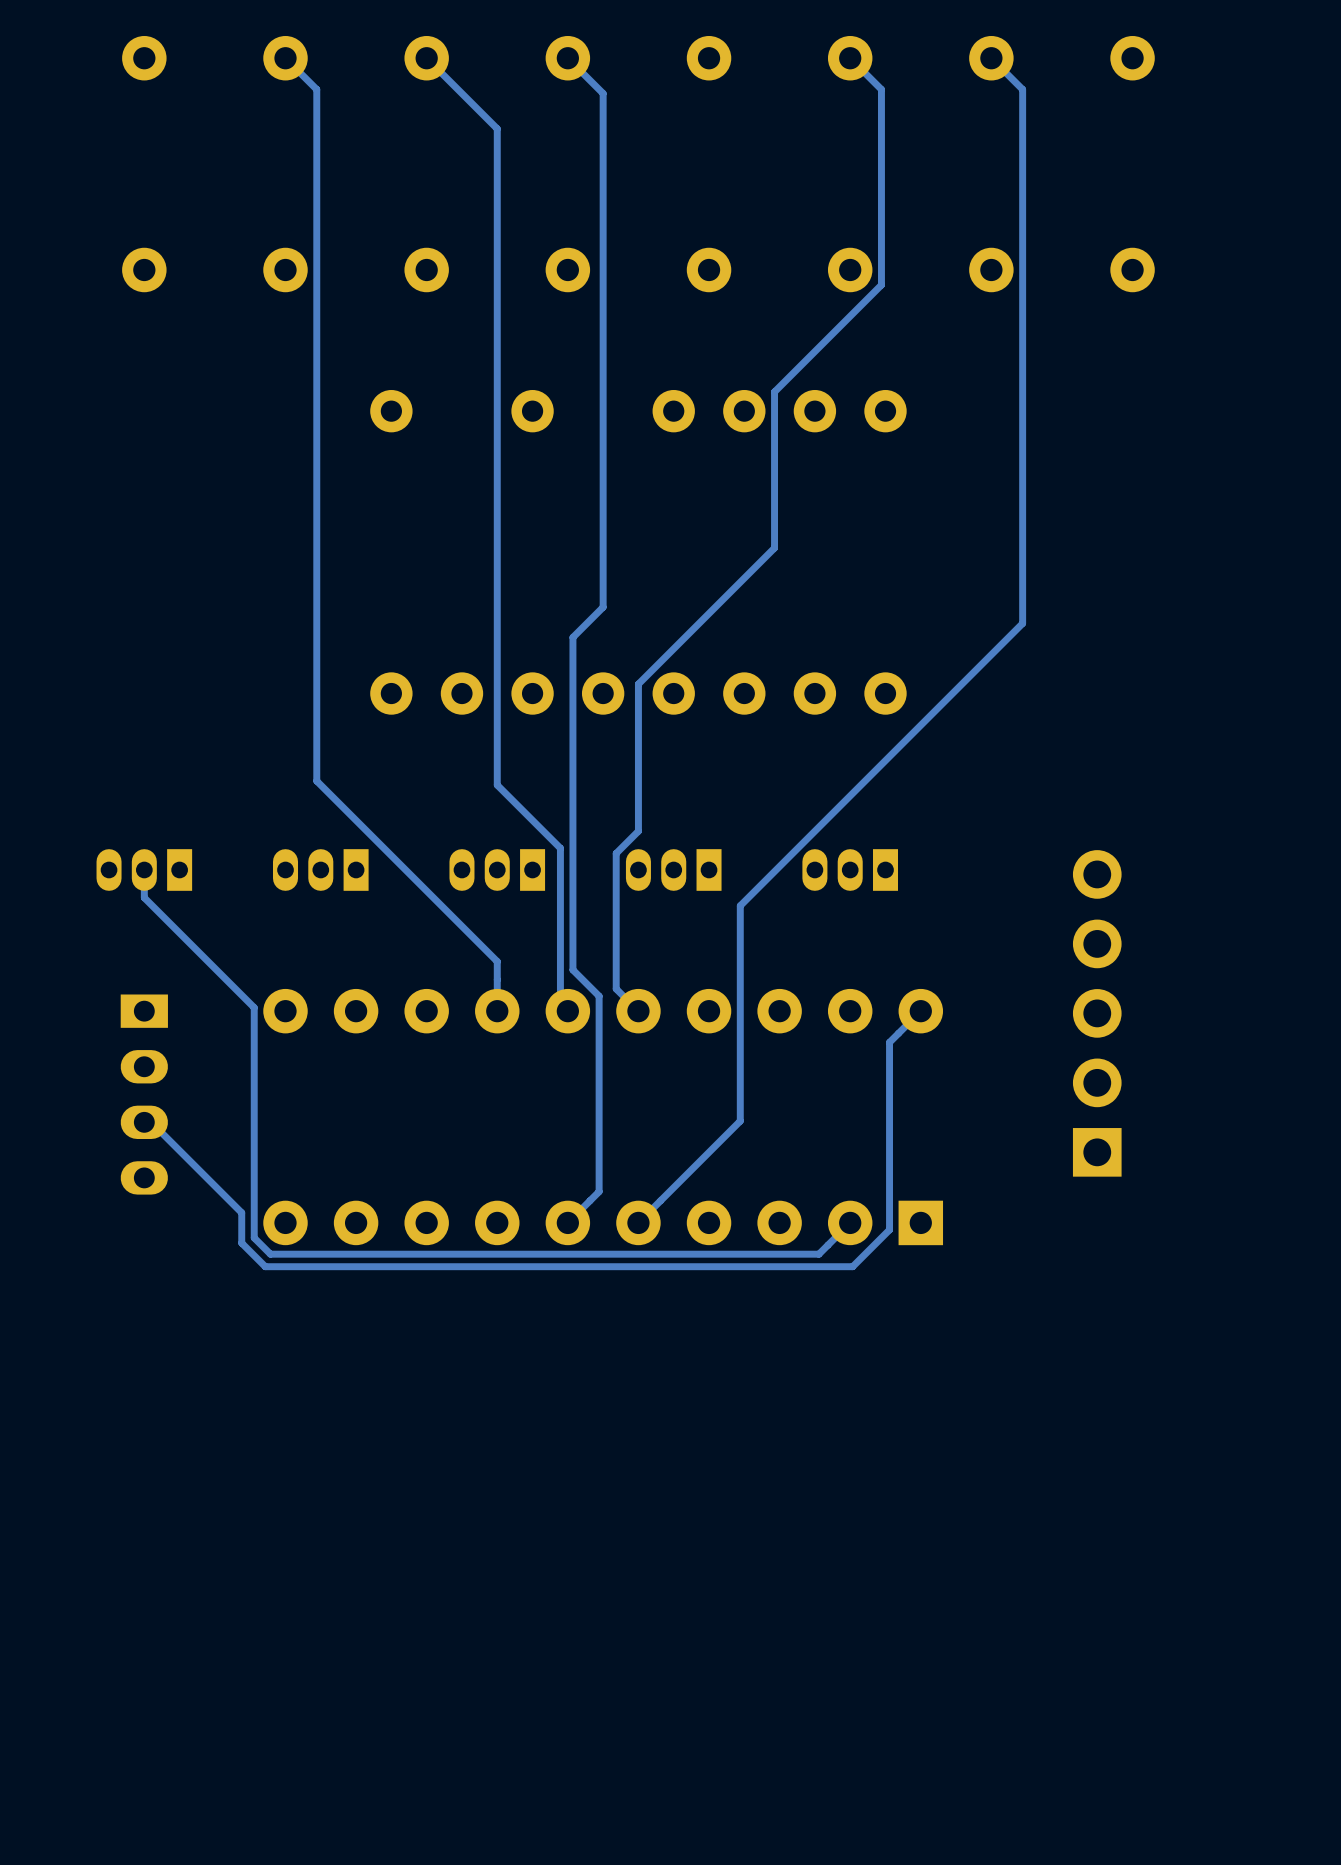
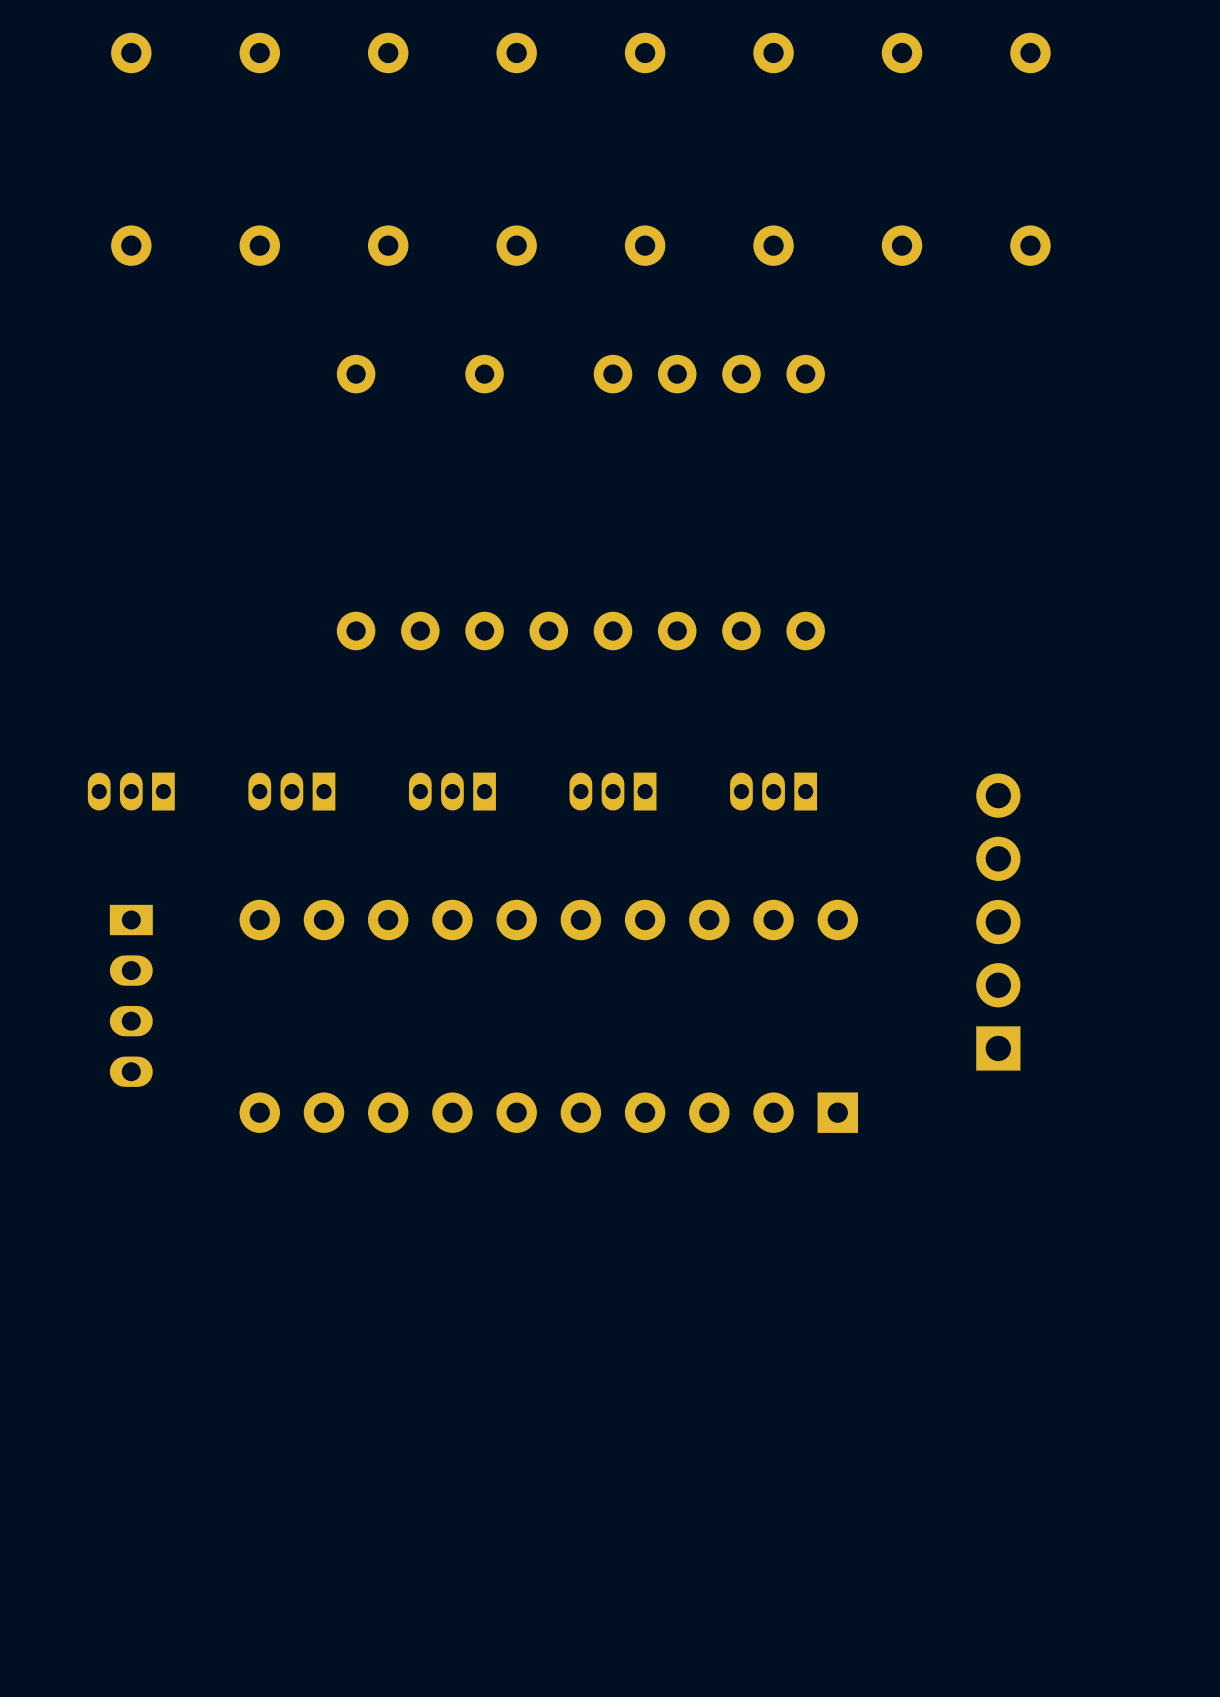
track: (285, 58) (316, 89) (316, 781) (497, 961) (497, 1011) -> none
track: (426, 58) (497, 128) (497, 785) (560, 848) (560, 1003) (567, 1011) -> none
track: (567, 58) (603, 93) (603, 607) (572, 637) (572, 969) (599, 996) (599, 1191) (567, 1222) -> none
track: (850, 58) (881, 89) (881, 285) (774, 391) (774, 548) (638, 684) (638, 831) (616, 853) (616, 988) (638, 1011) -> none
track: (991, 58) (1022, 89) (1022, 623) (740, 905) (740, 1121) (638, 1222) -> none
track: (144, 869) (144, 897) (254, 1007) (254, 1237) (270, 1254) (818, 1254) (850, 1222) -> none
track: (920, 1011) (889, 1042) (889, 1229) (852, 1266) (265, 1266) (241, 1243) (241, 1212) (151, 1122) (144, 1122) -> none

